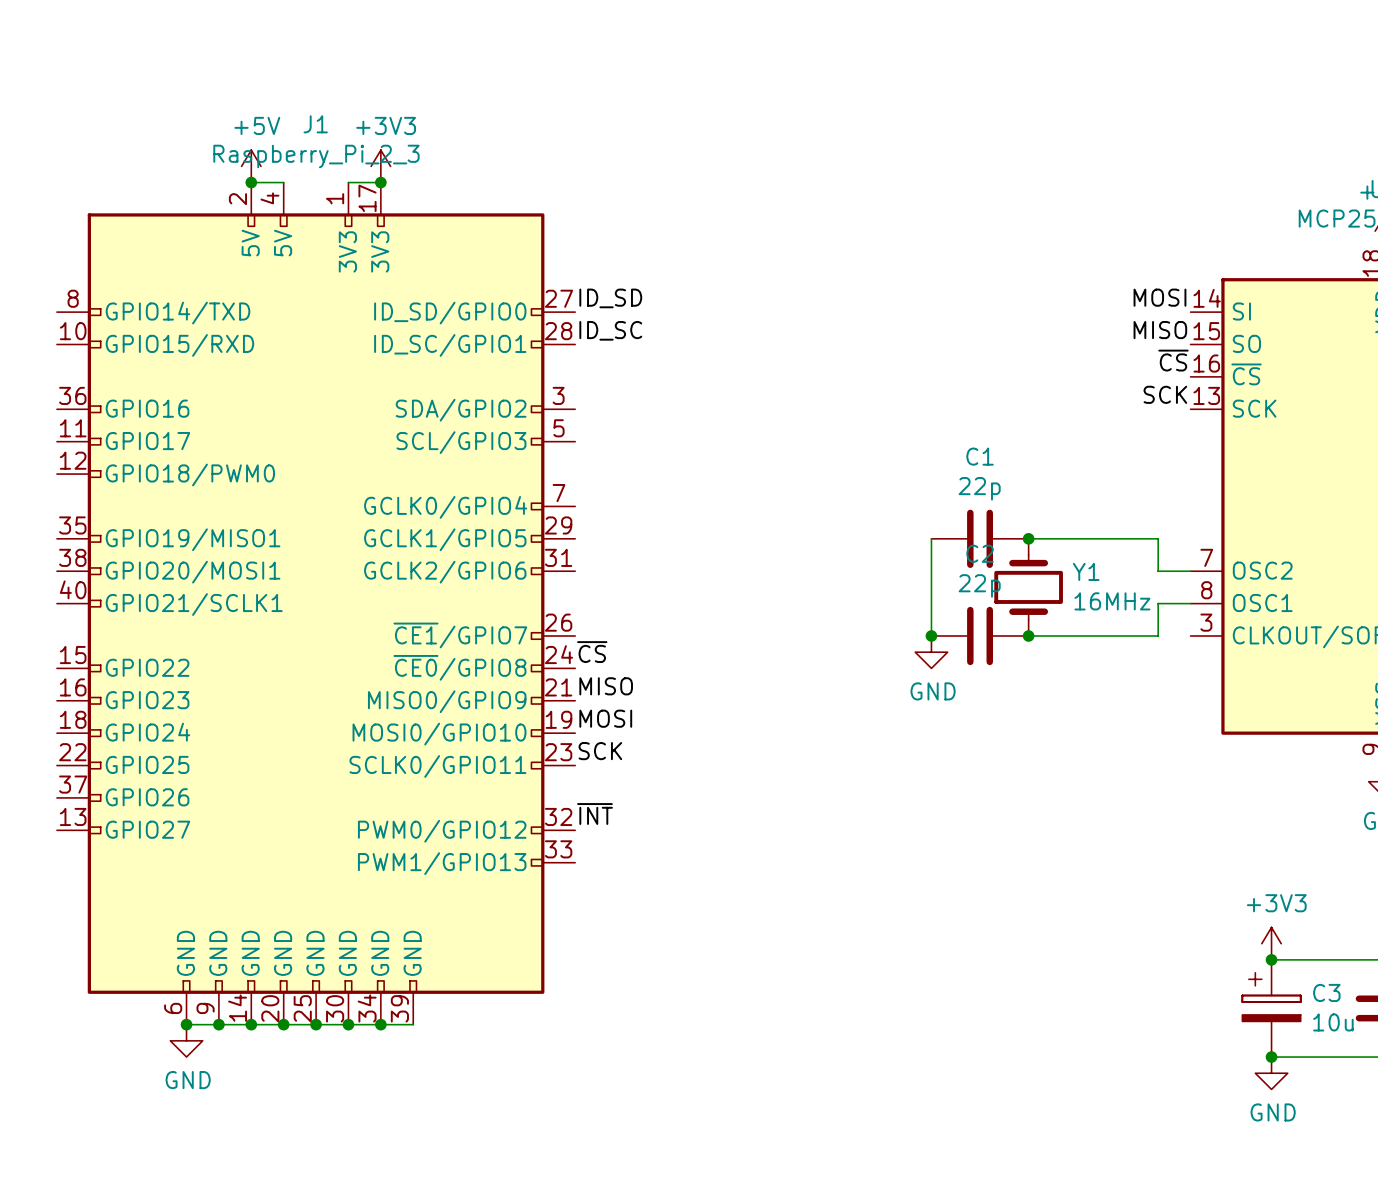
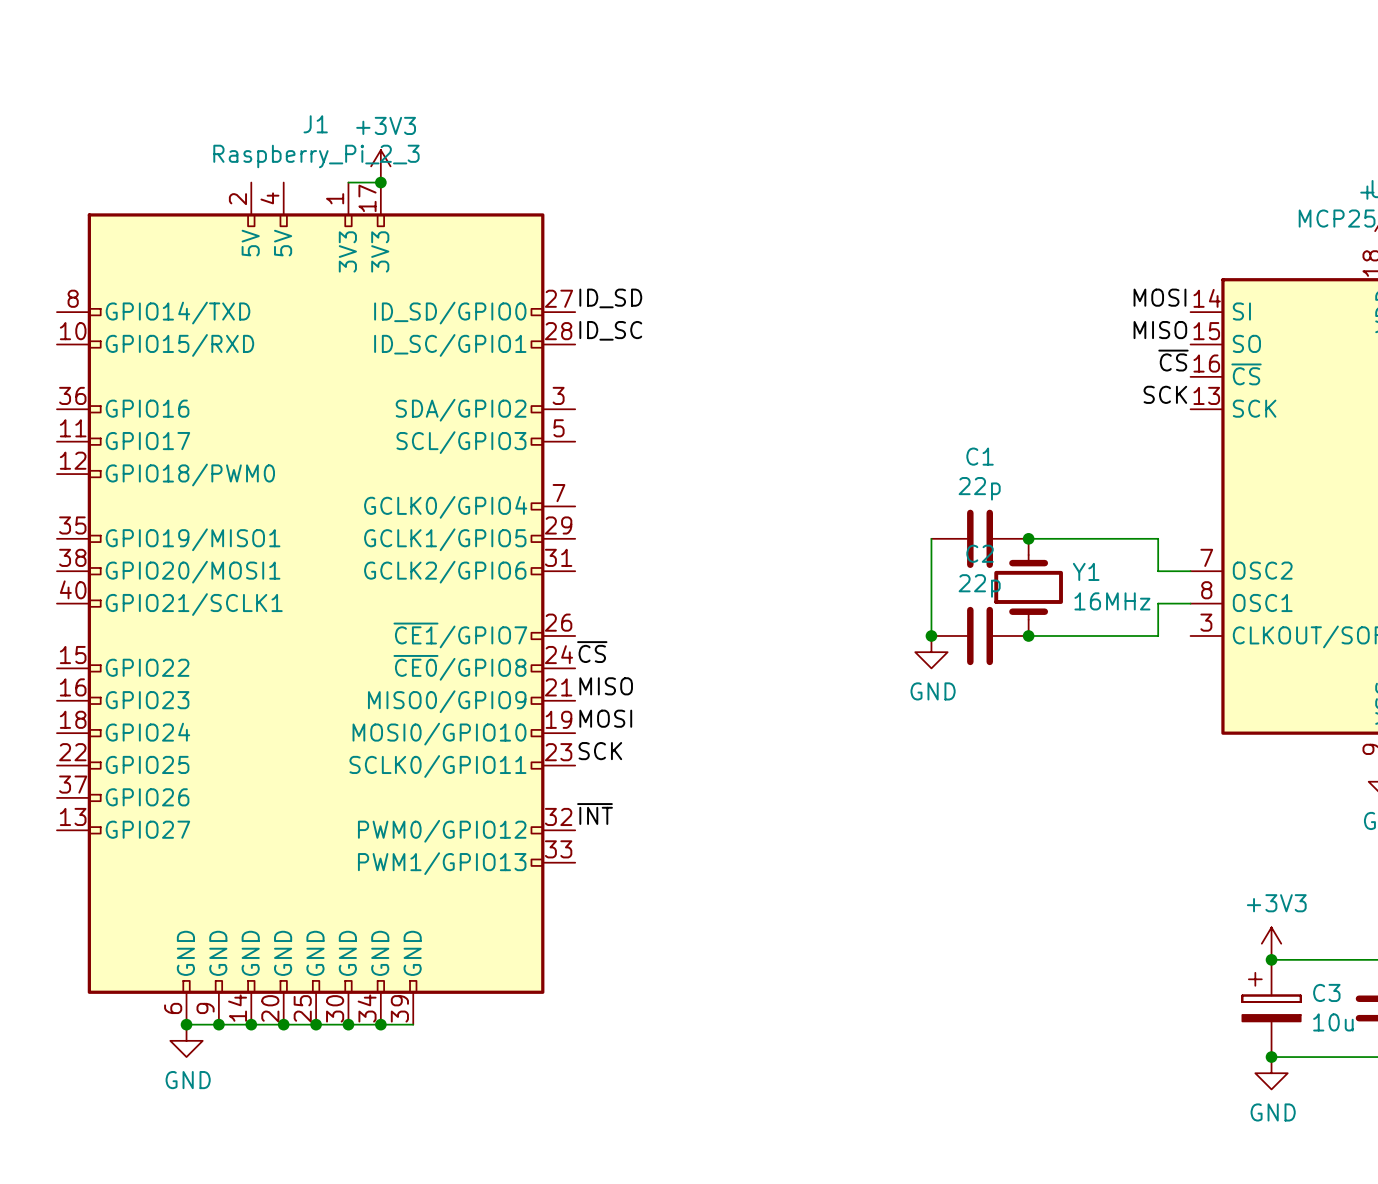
power symbol: +5V (251, 166) -> none
wire: (251, 182) (283, 182) -> none
junction: (251, 182) -> none

